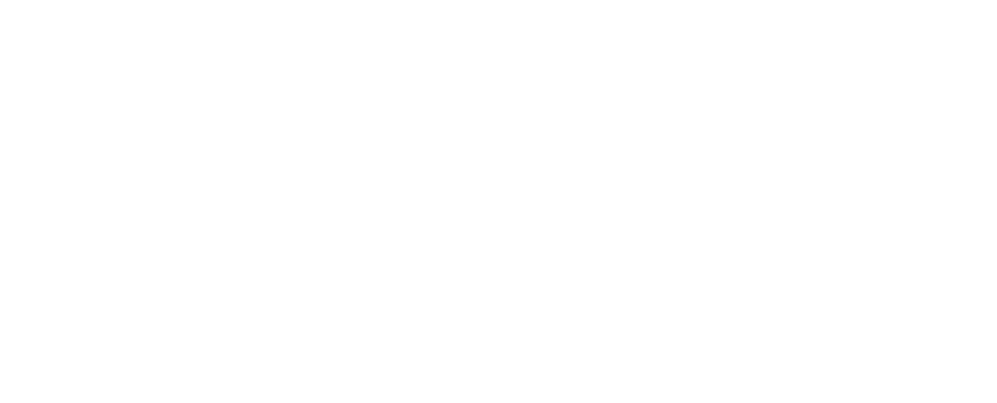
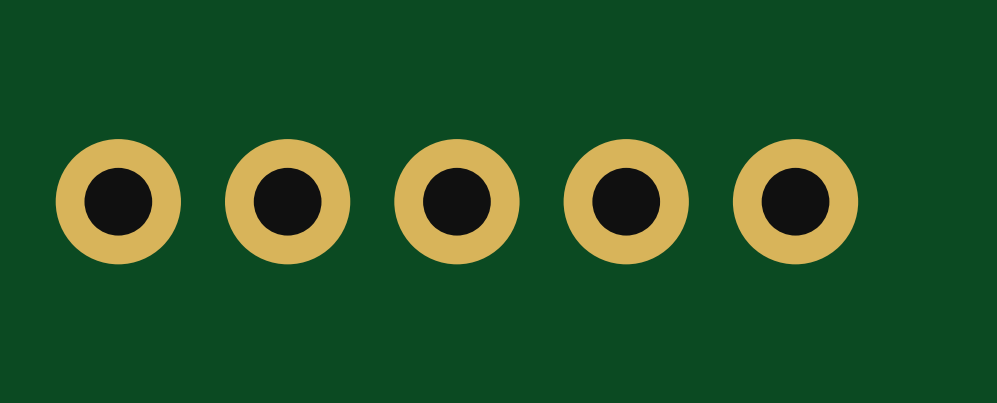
part: none -> (456, 201)

